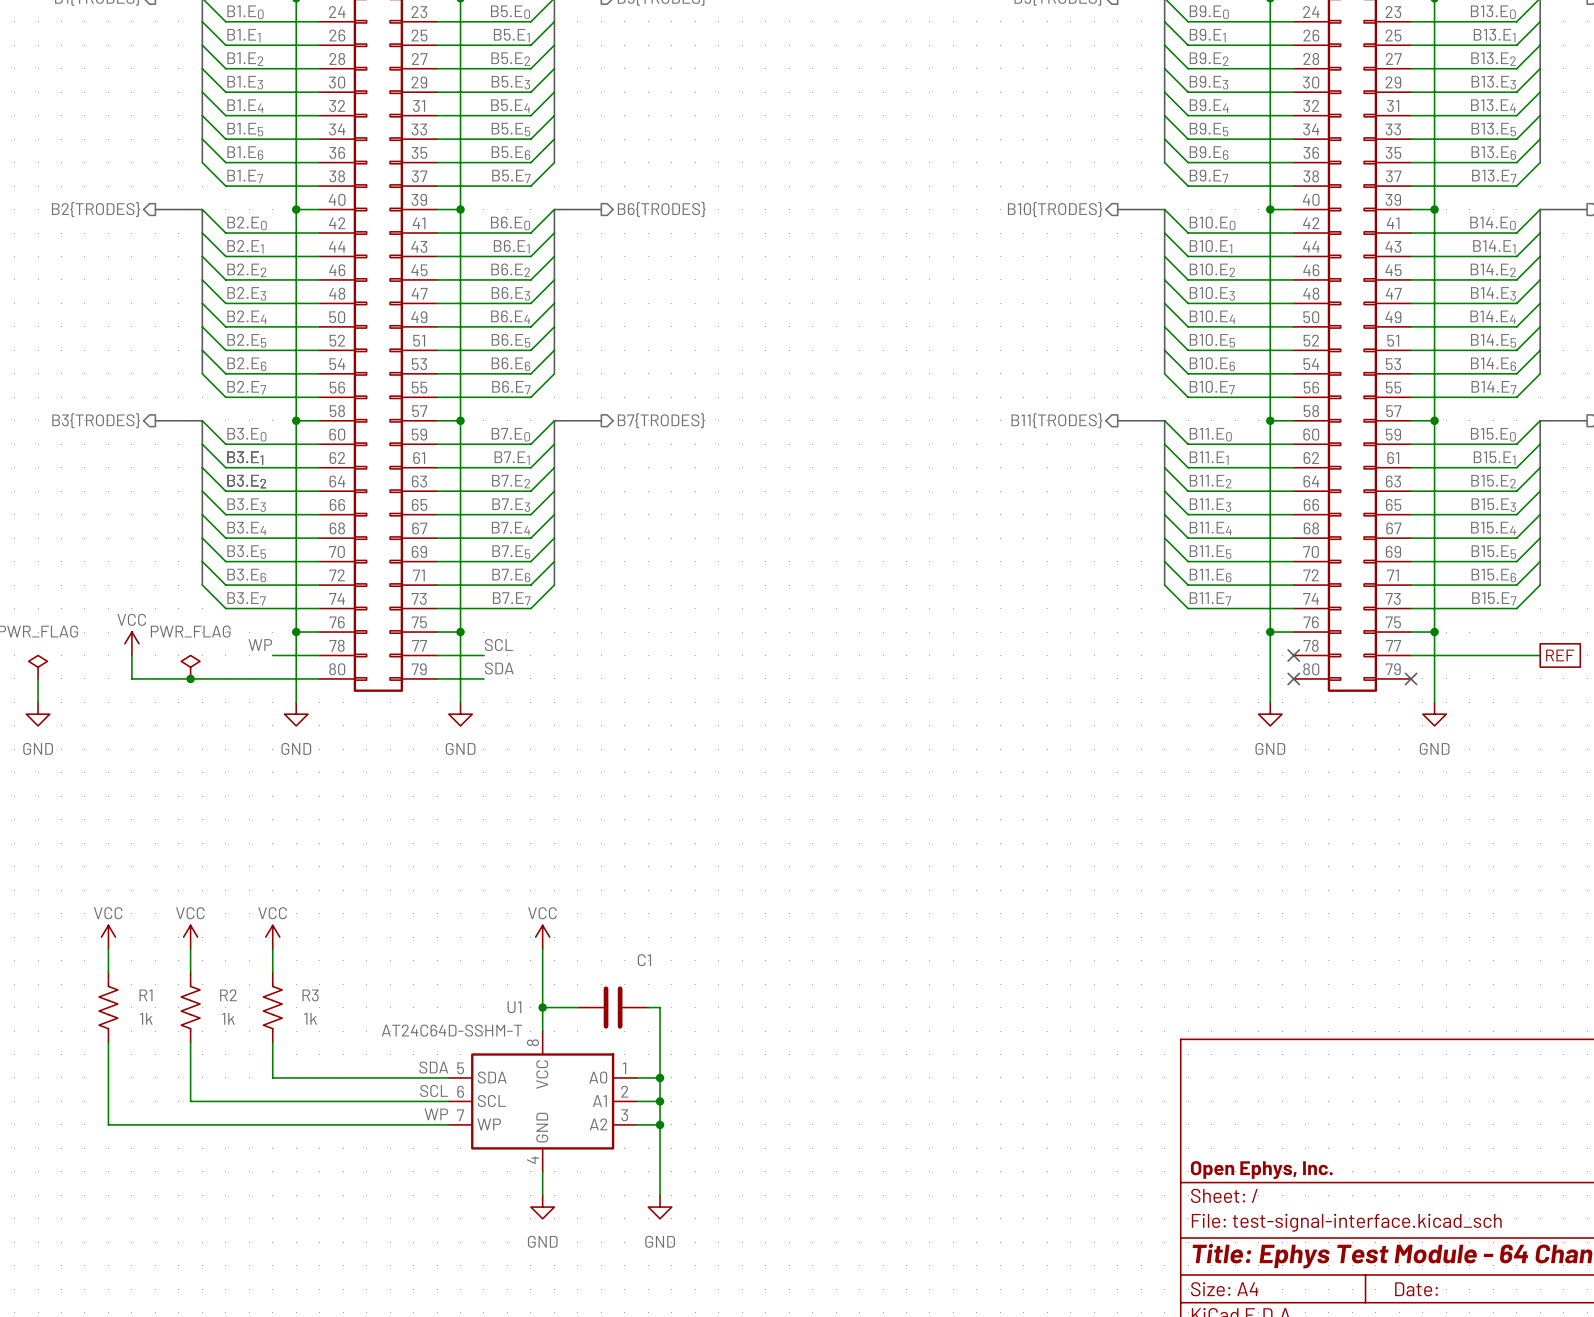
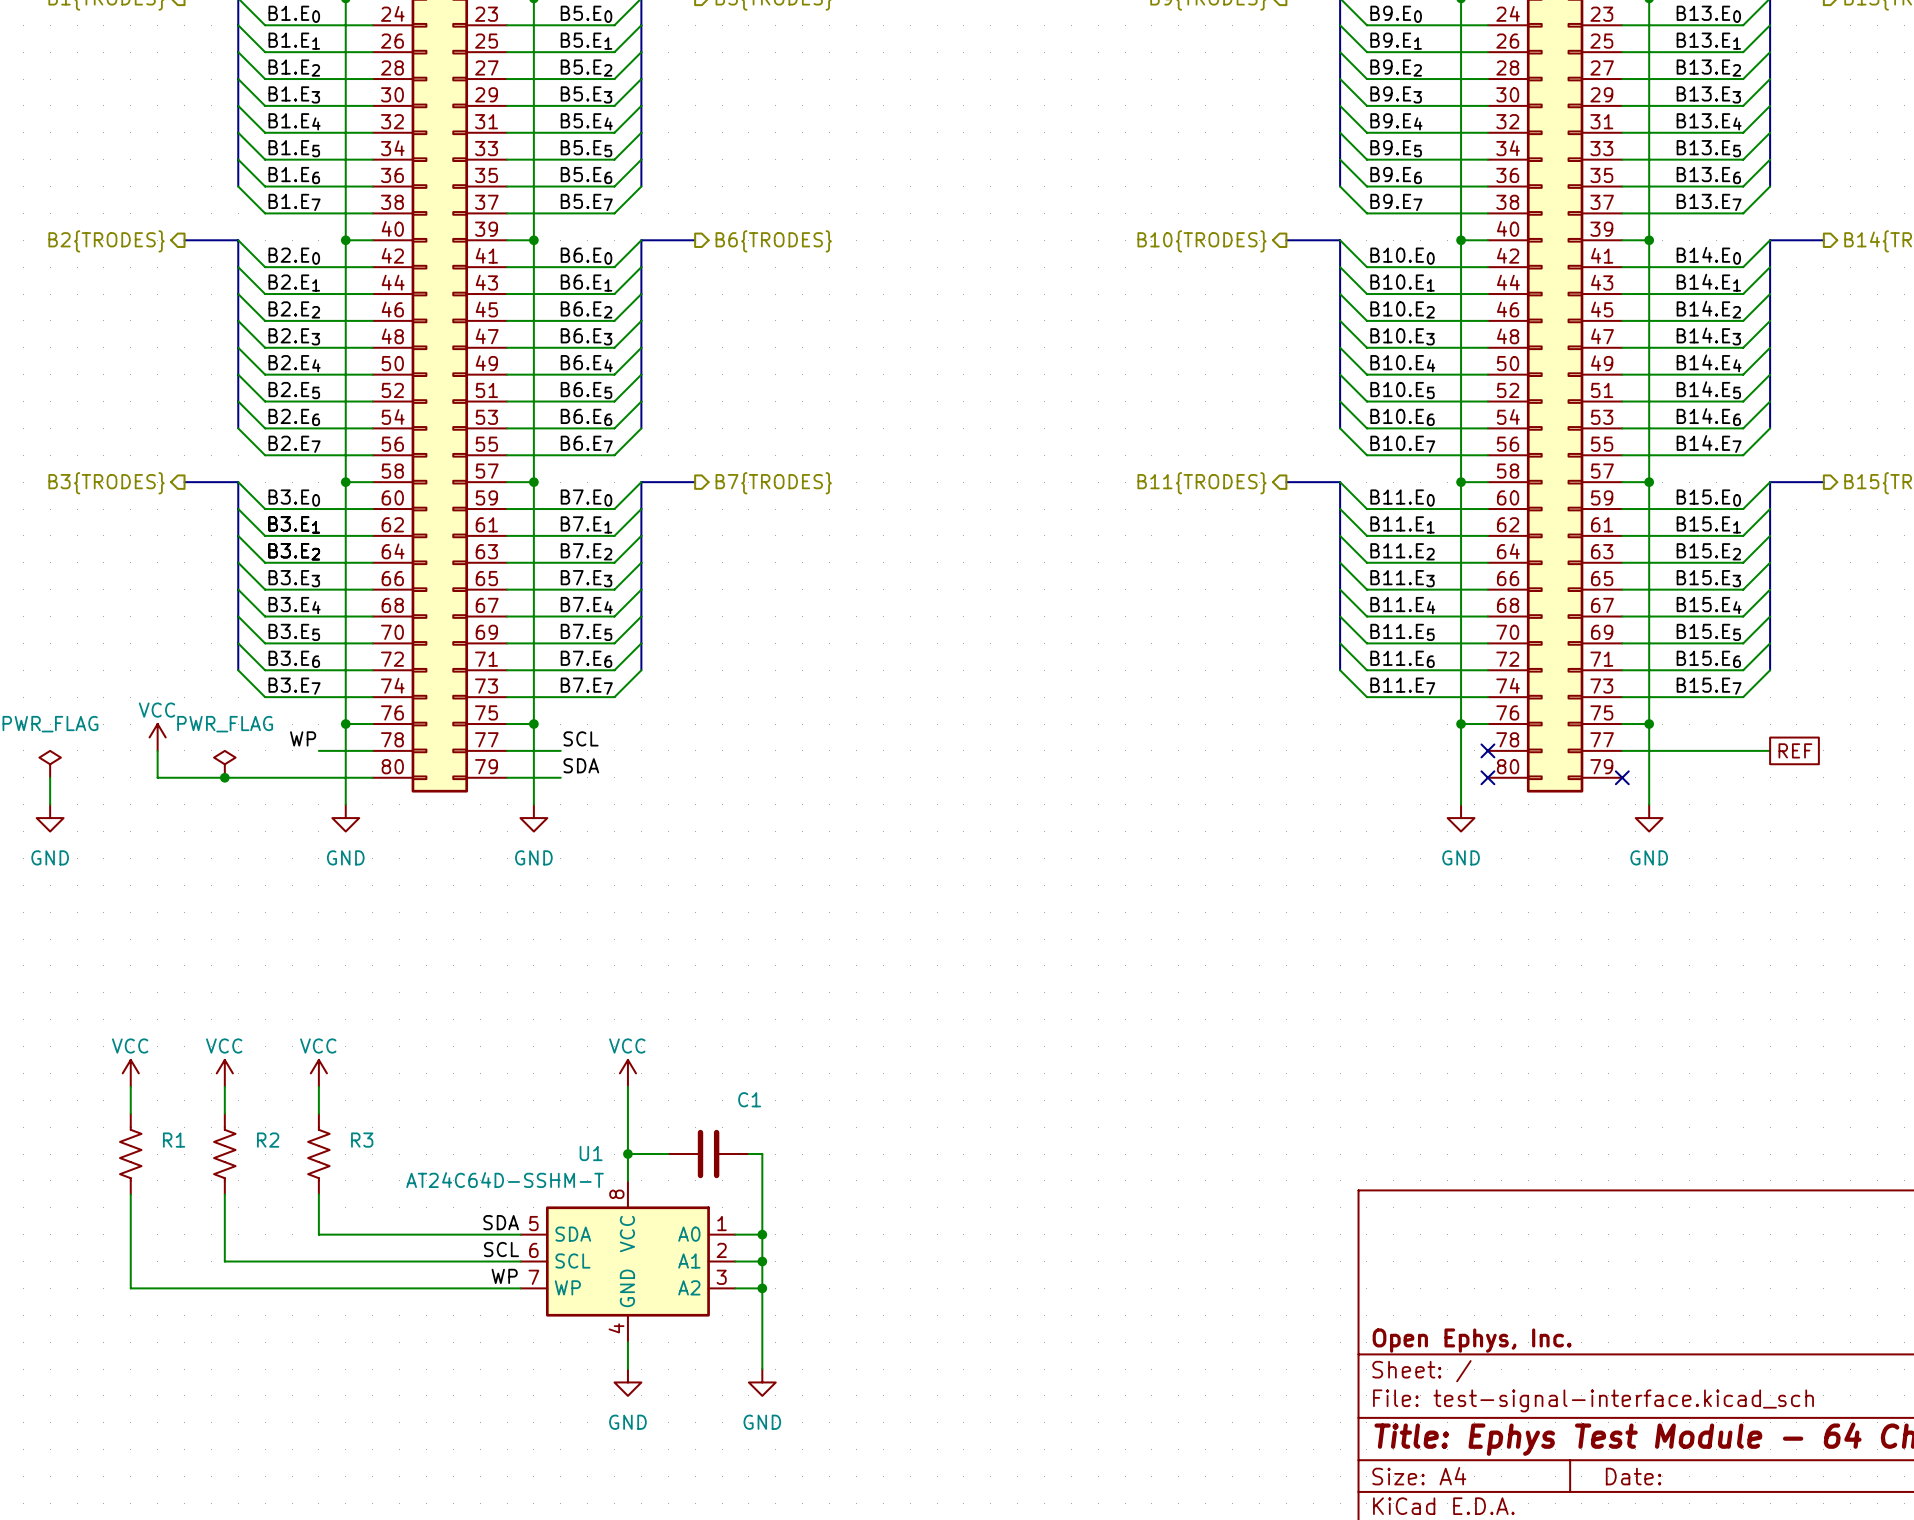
R1 value: 1k (146, 1018) -> none
R2 value: 1k (228, 1018) -> none
R3 value: 1k (310, 1018) -> none

